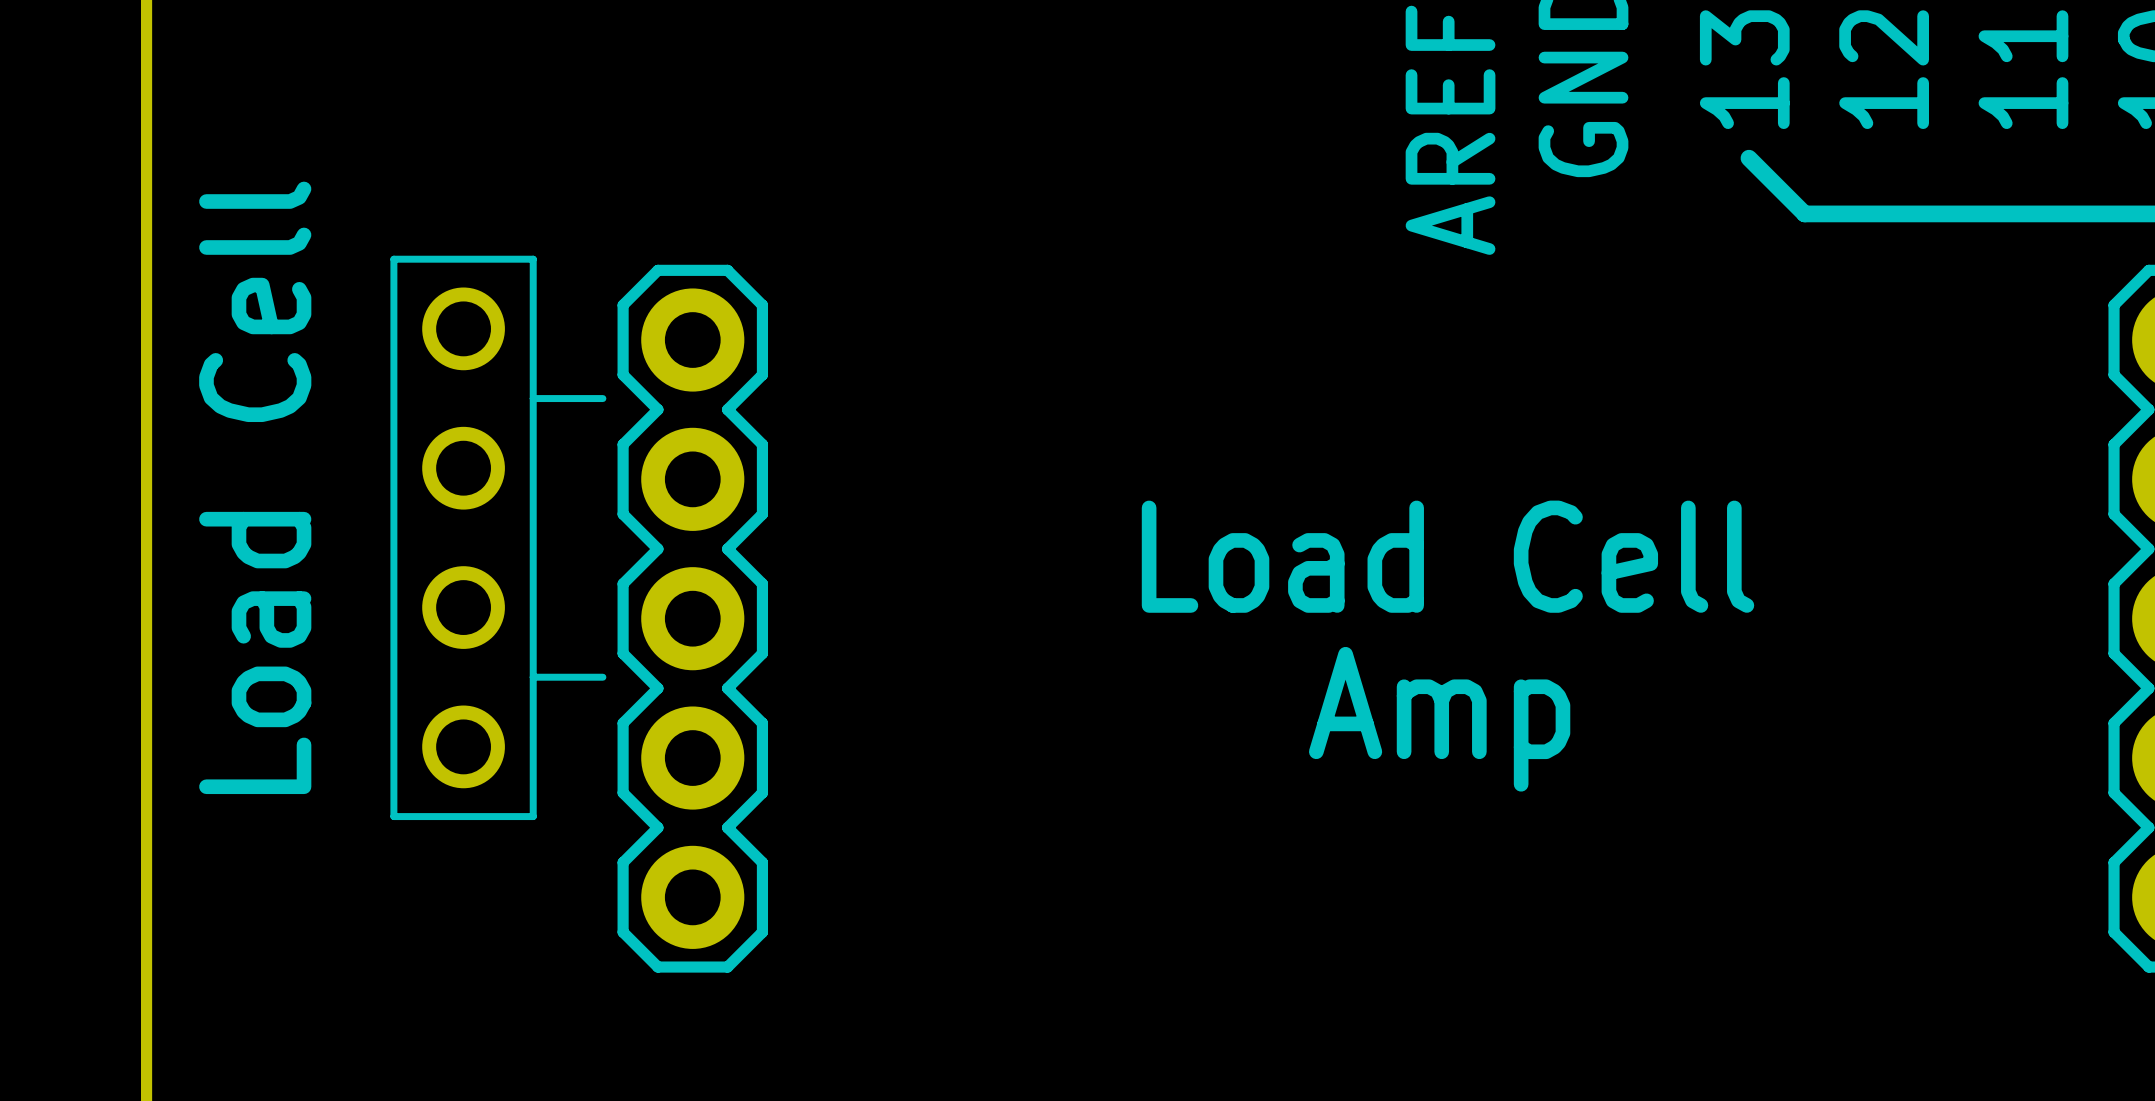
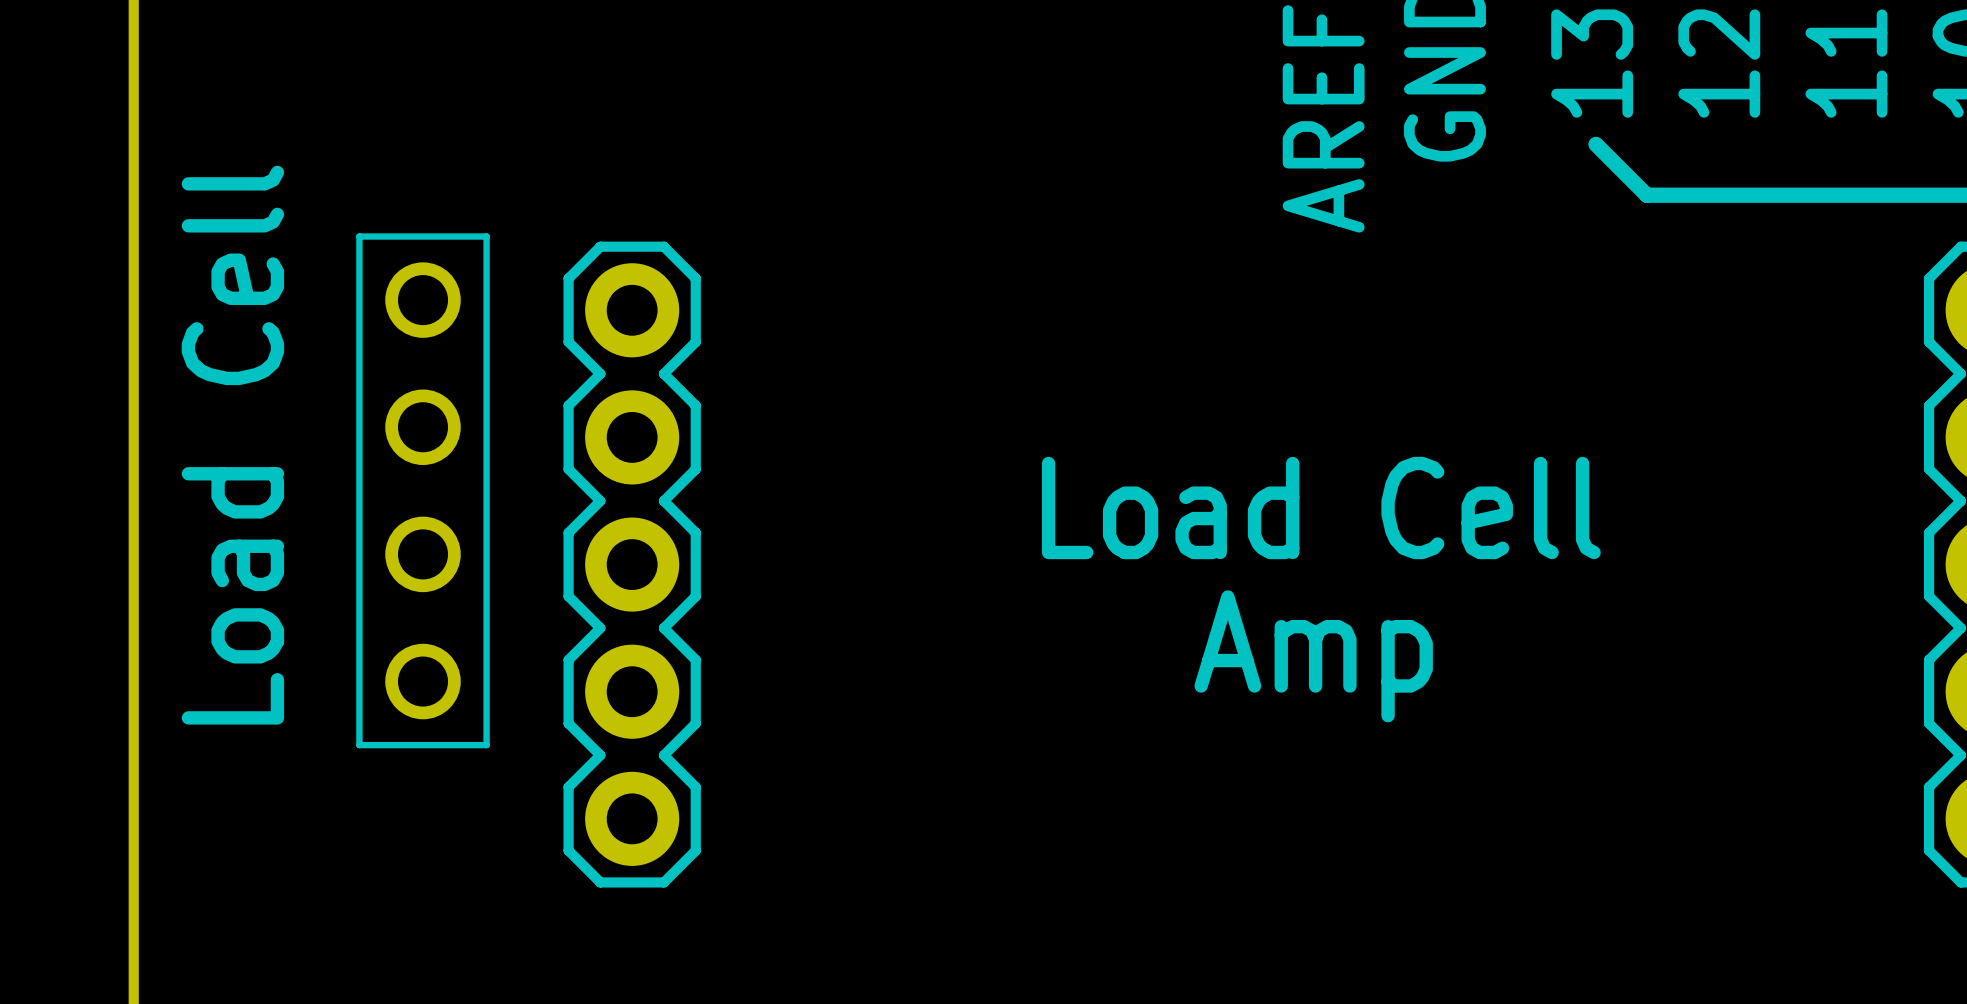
part footprint: [390, 255, 607, 821] -> [356, 233, 490, 749]

